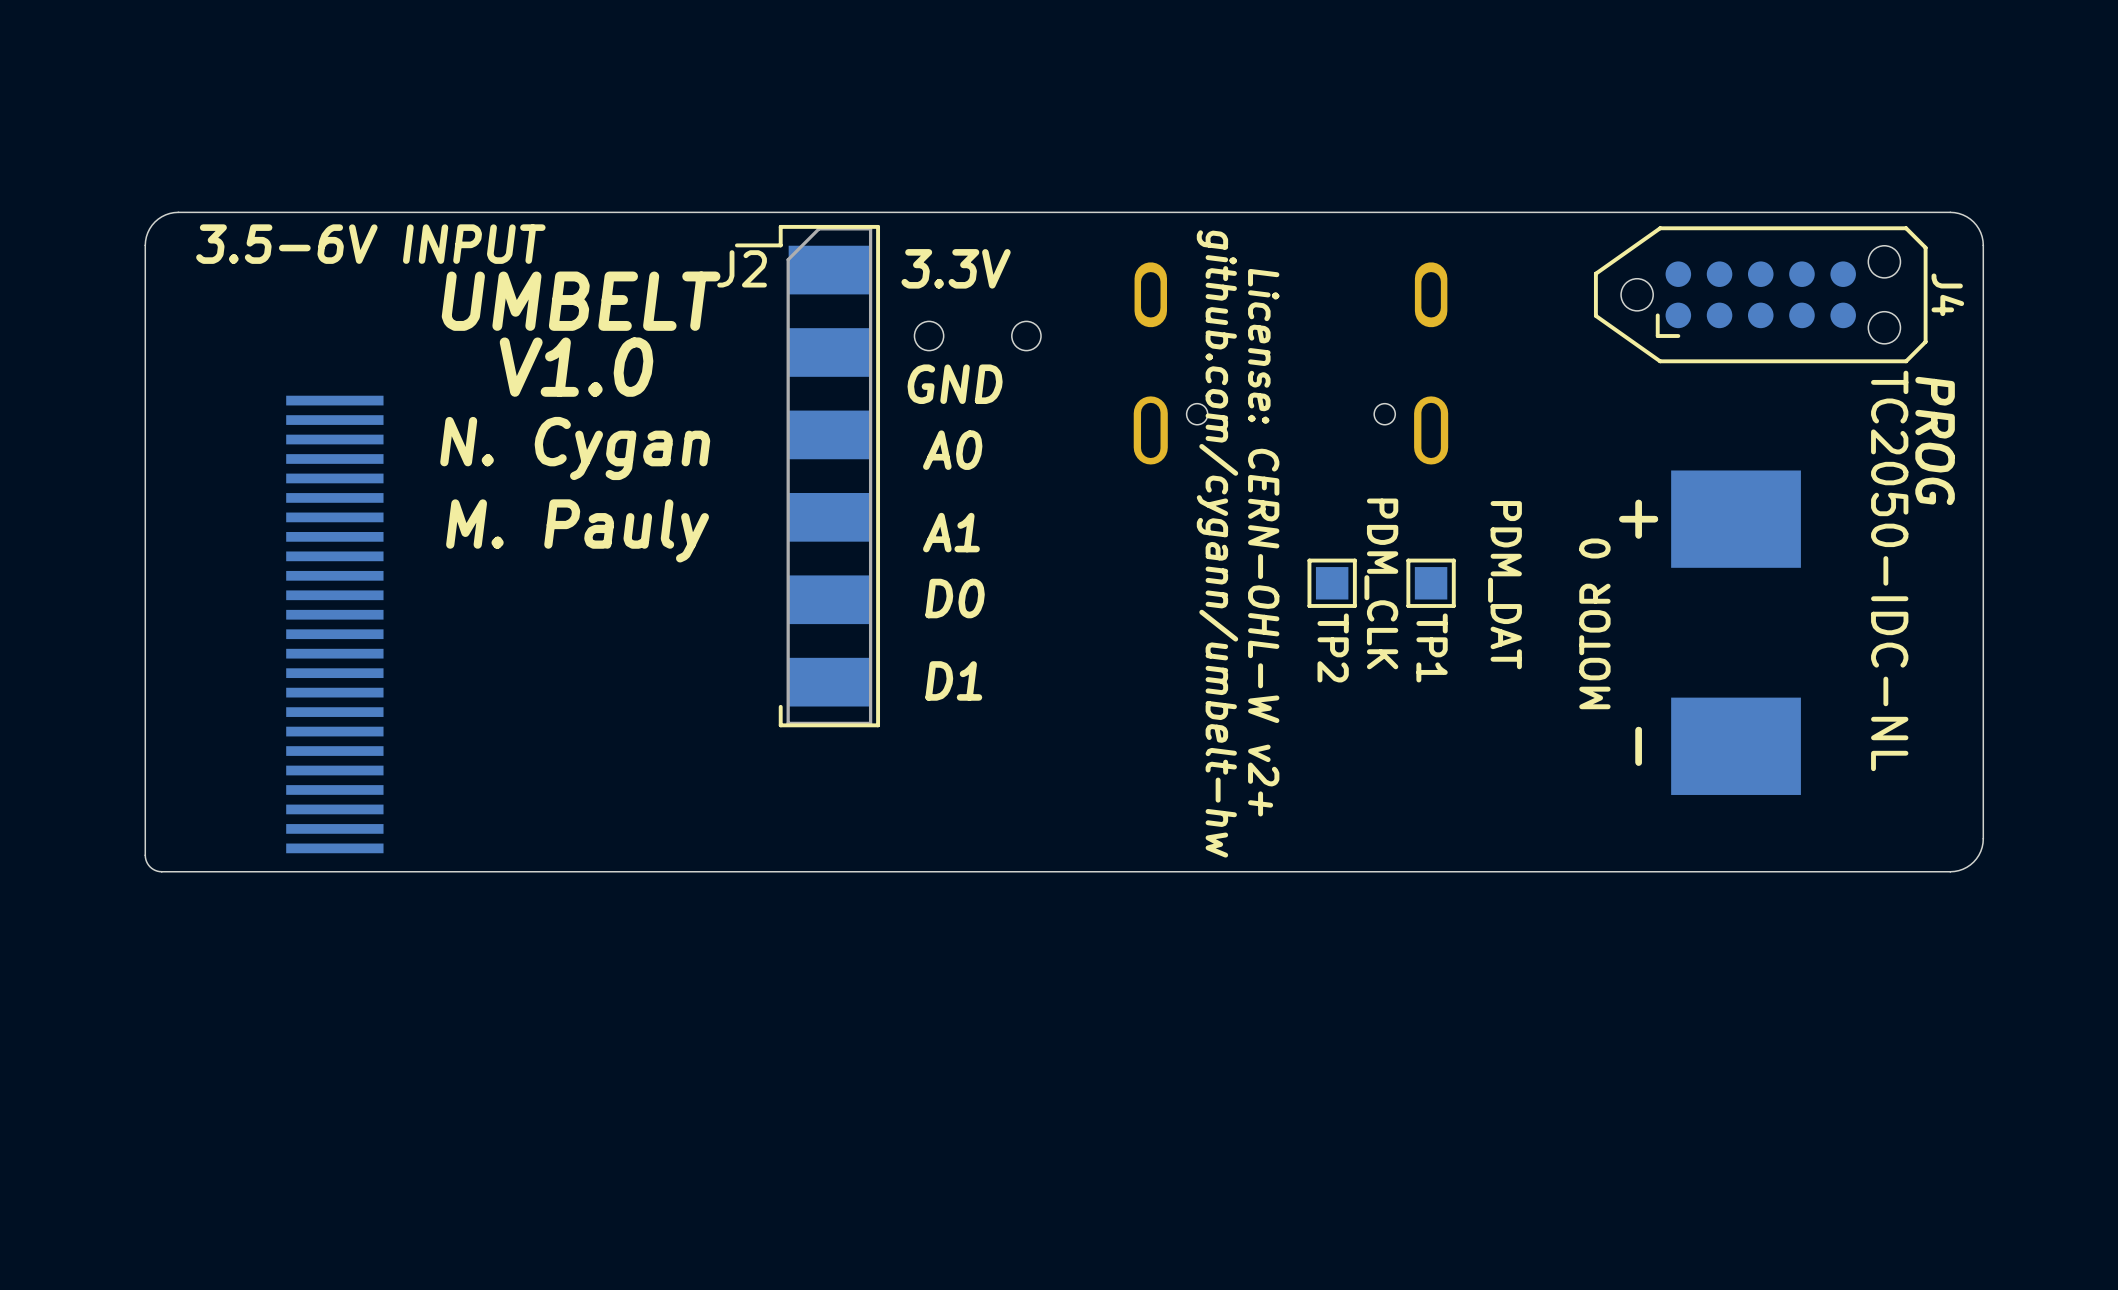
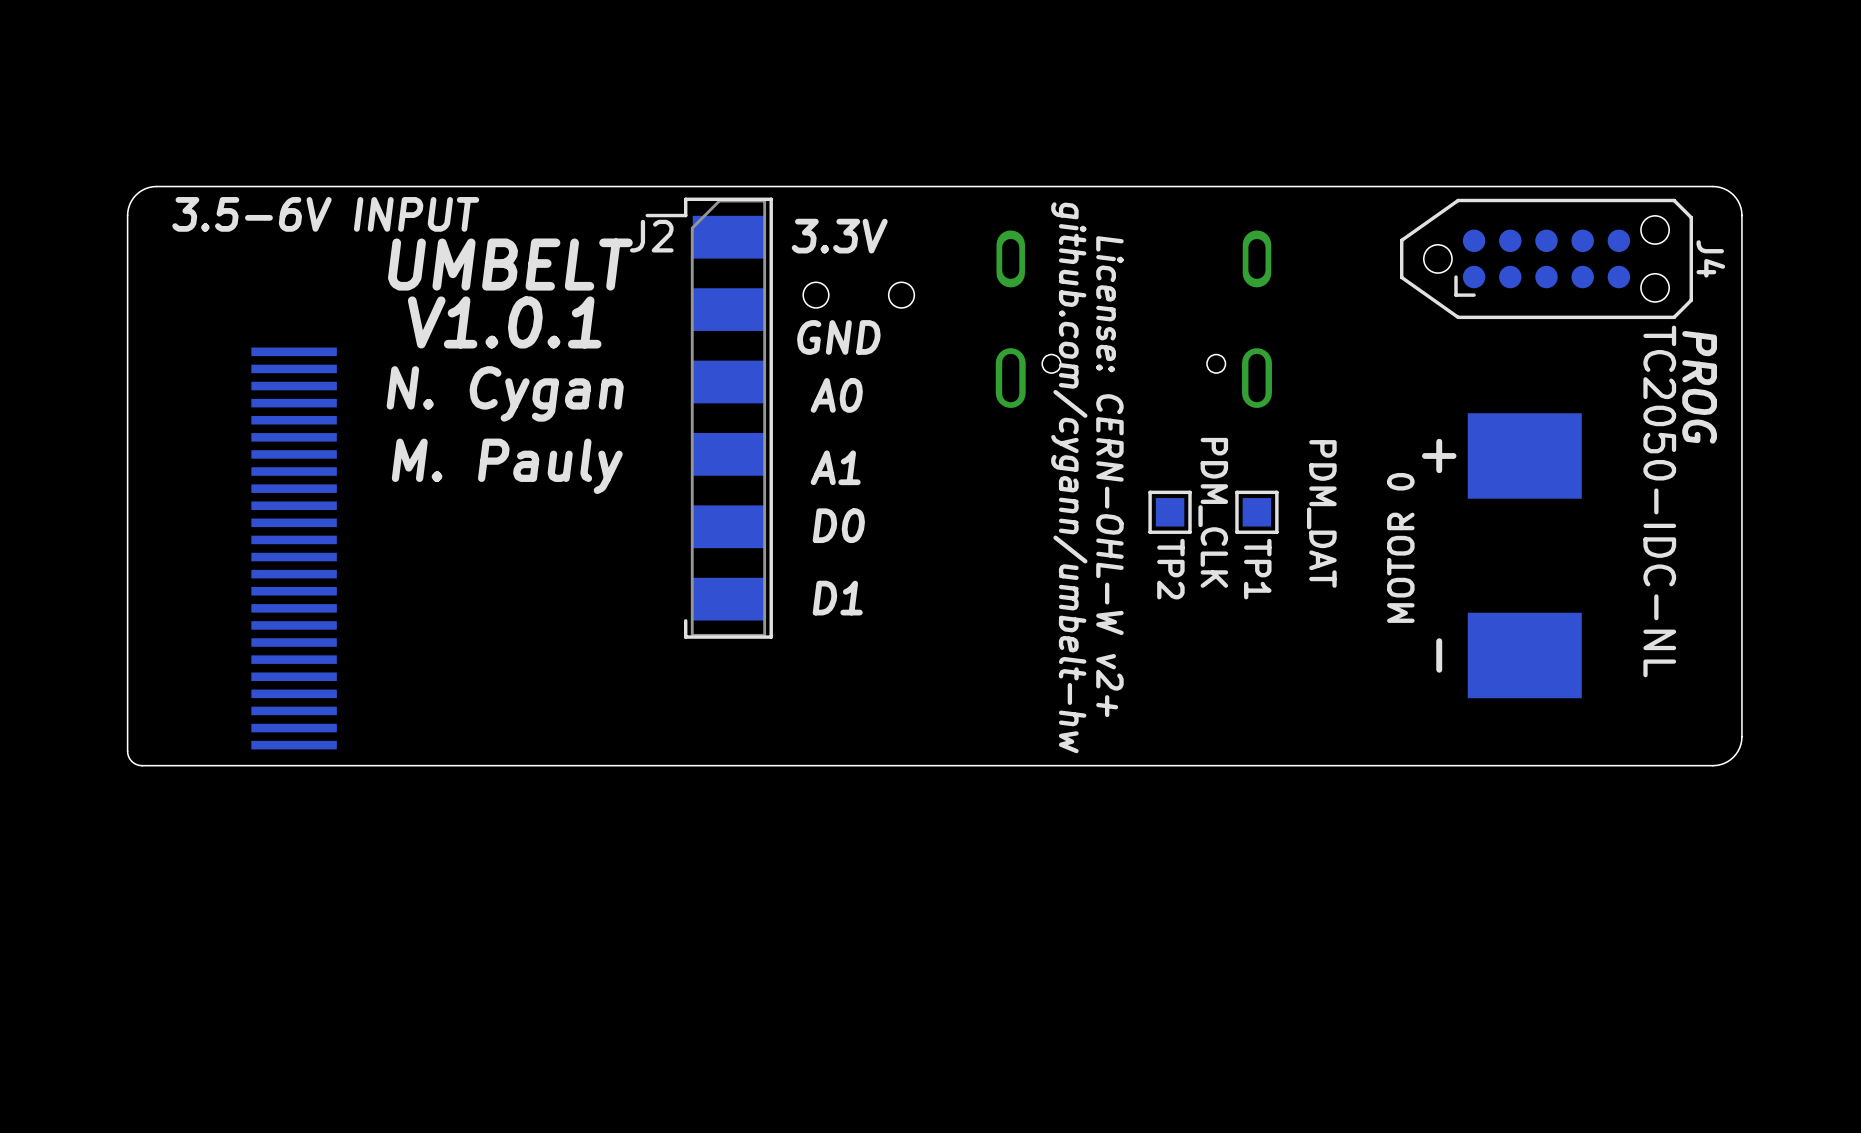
text: V1.0 (576, 367) -> V1.0.1 (504, 322)

